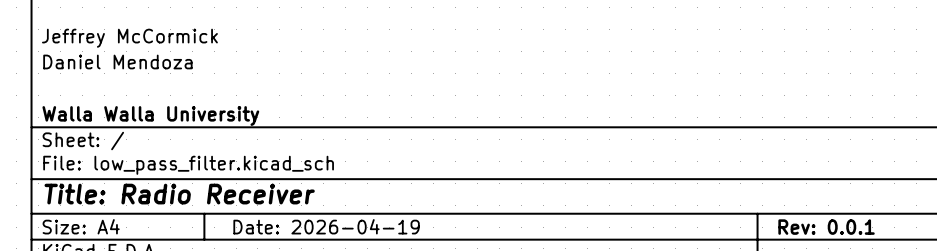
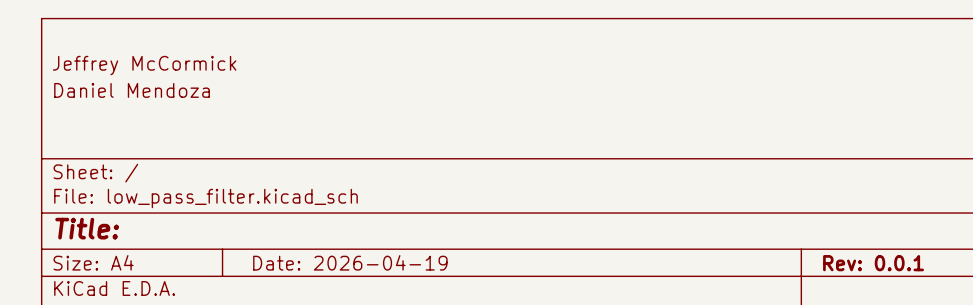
title block: Walla Walla University (150, 116) -> none
title block: Title: Radio Receiver (179, 194) -> Title: (87, 228)

